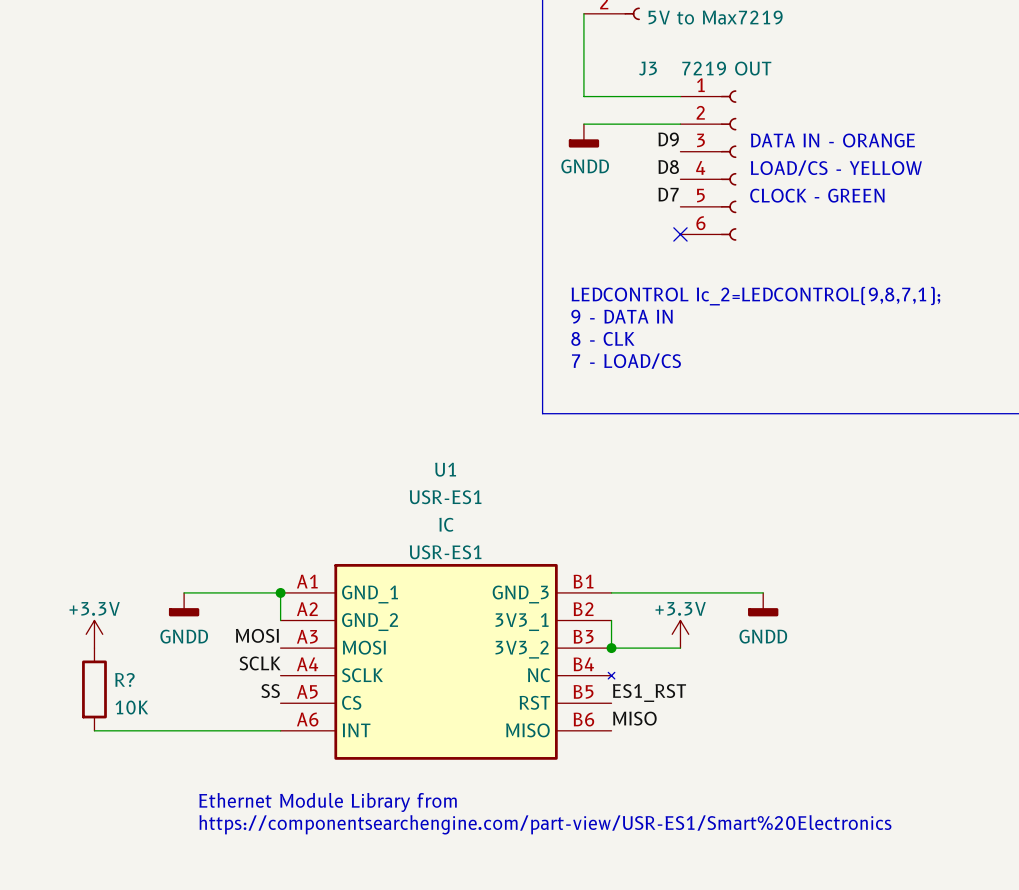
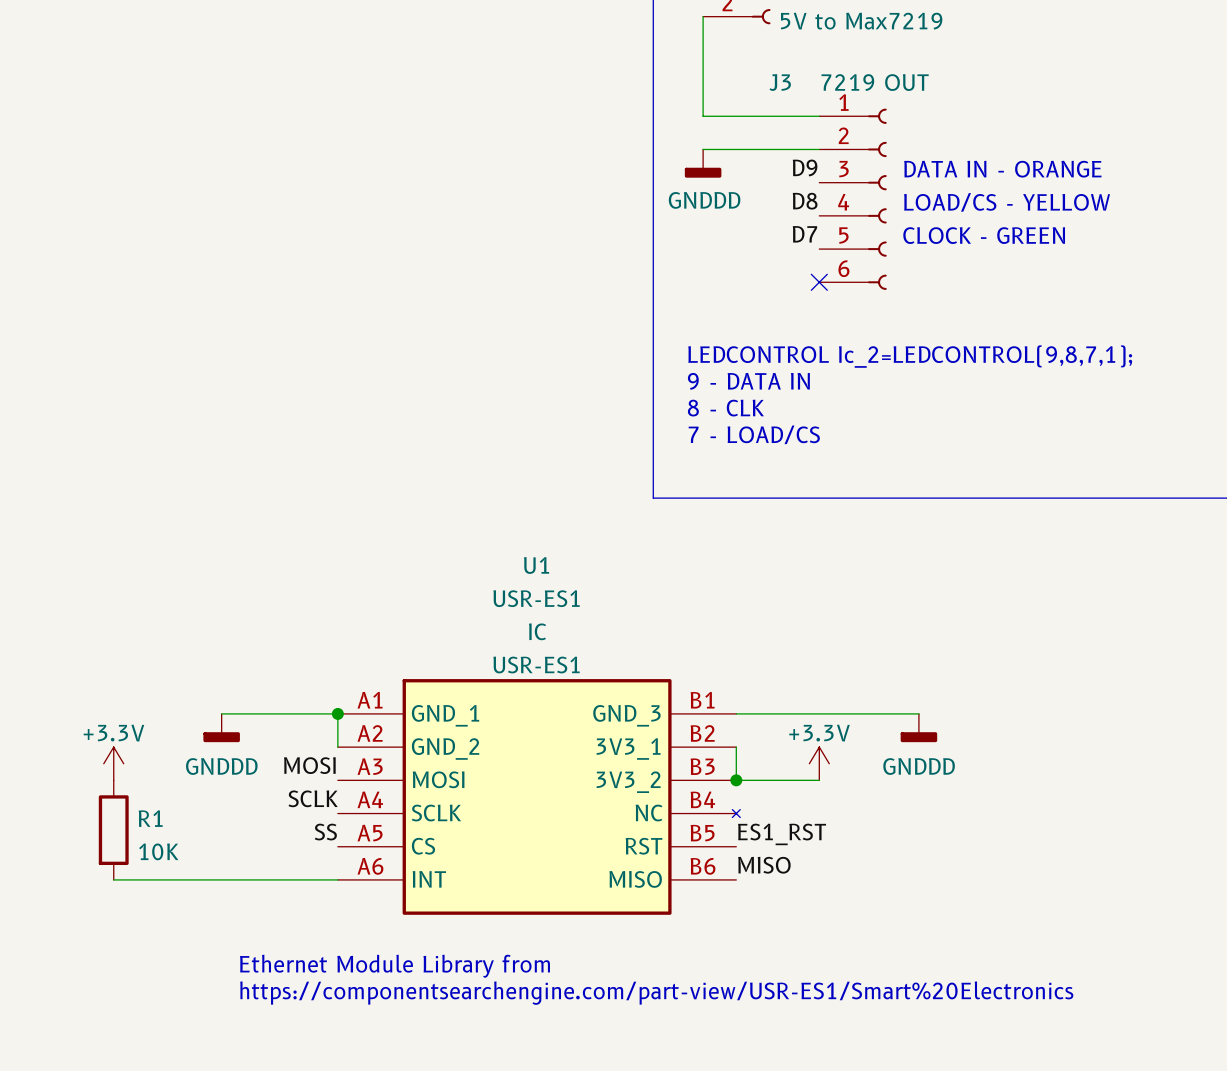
power symbol: GNDD (583, 135) -> GNDDD (703, 163)
power symbol: GNDD (184, 604) -> GNDDD (221, 728)
power symbol: GNDD (763, 604) -> GNDDD (918, 728)
R? name: R? (124, 679) -> R1 (150, 818)

